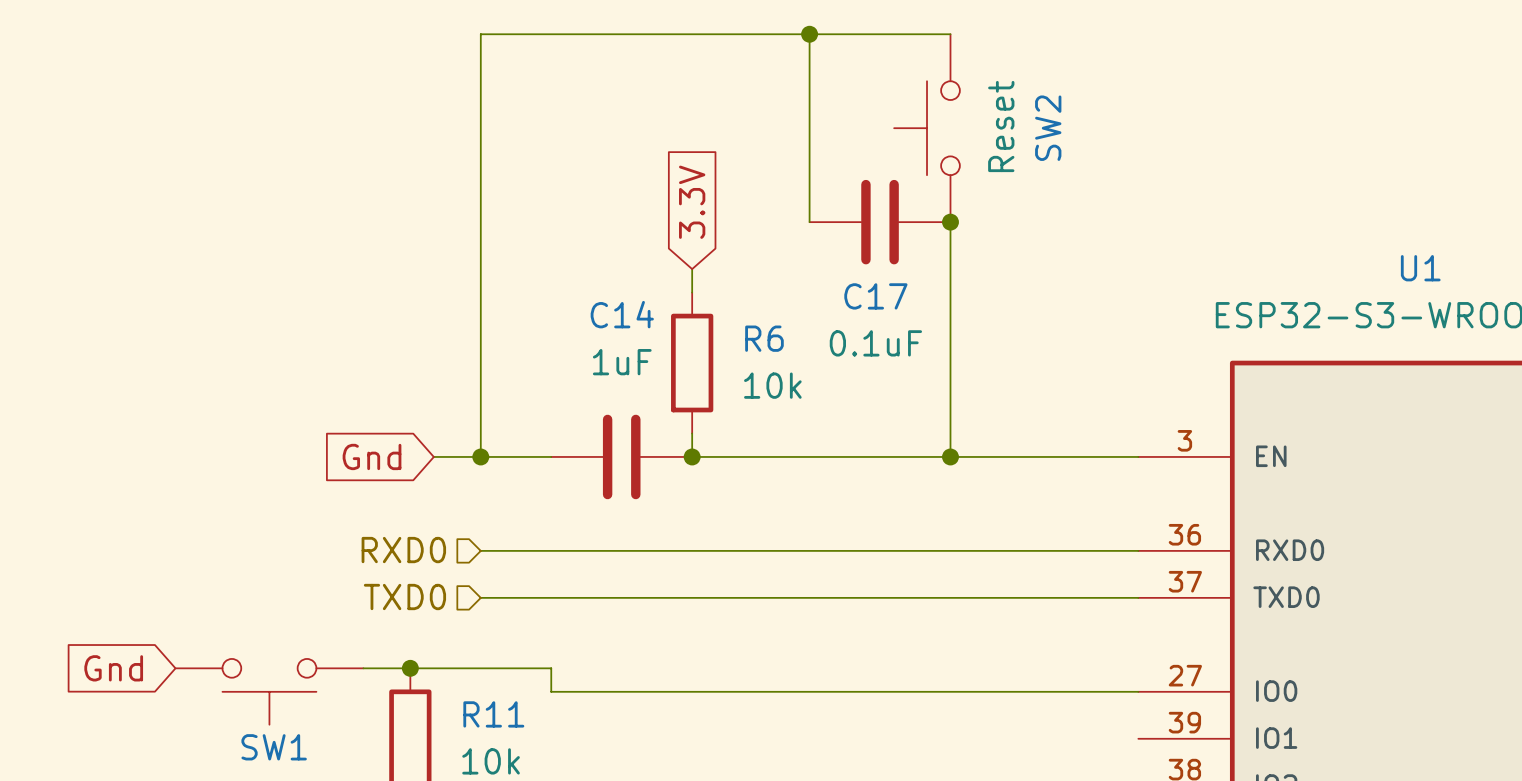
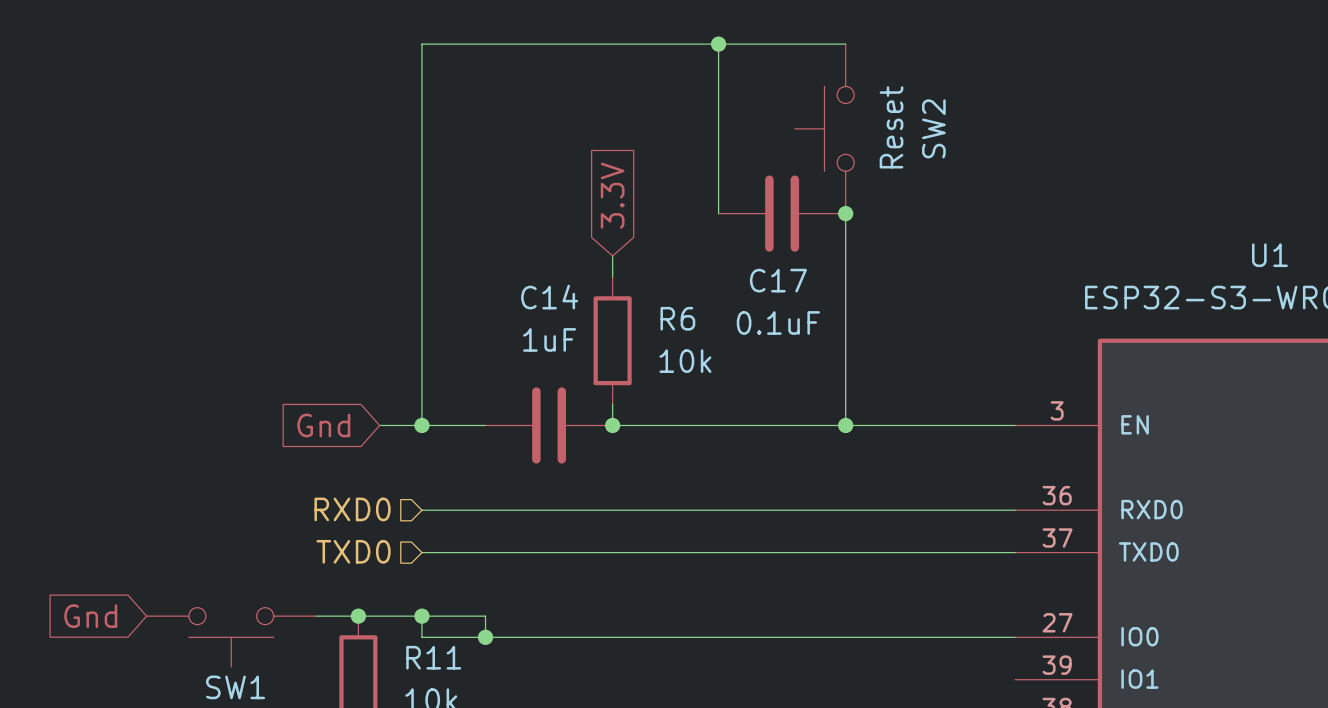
wire: none -> (421, 616) (421, 637) (485, 637)
junction: none -> (421, 616)
junction: none -> (485, 637)

